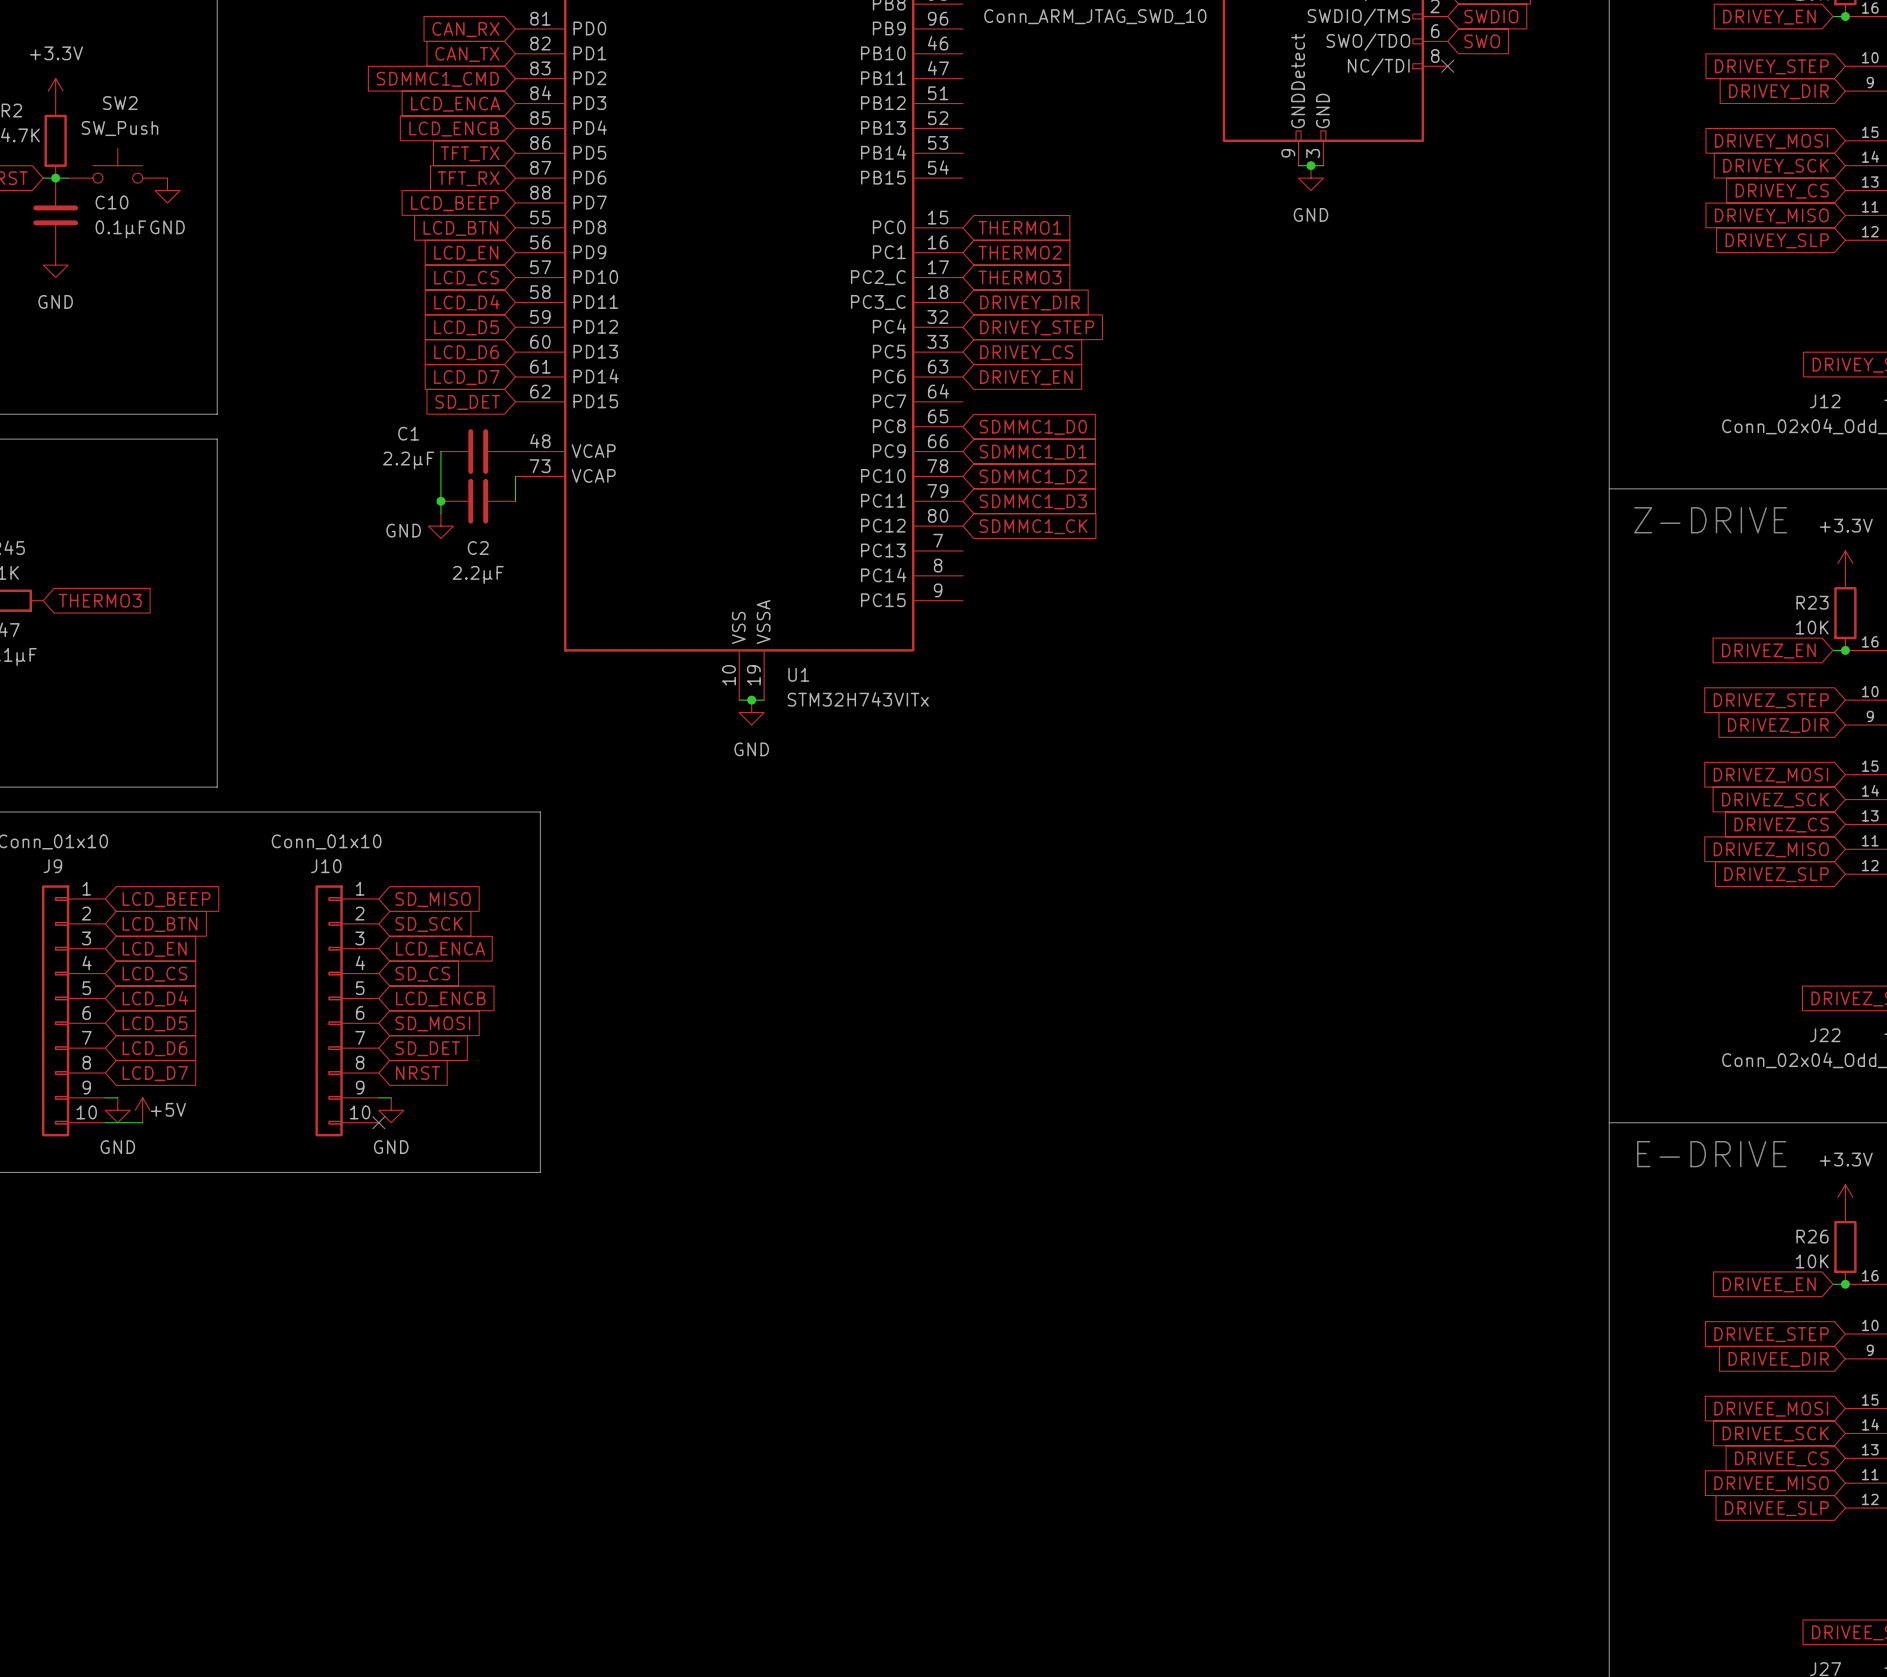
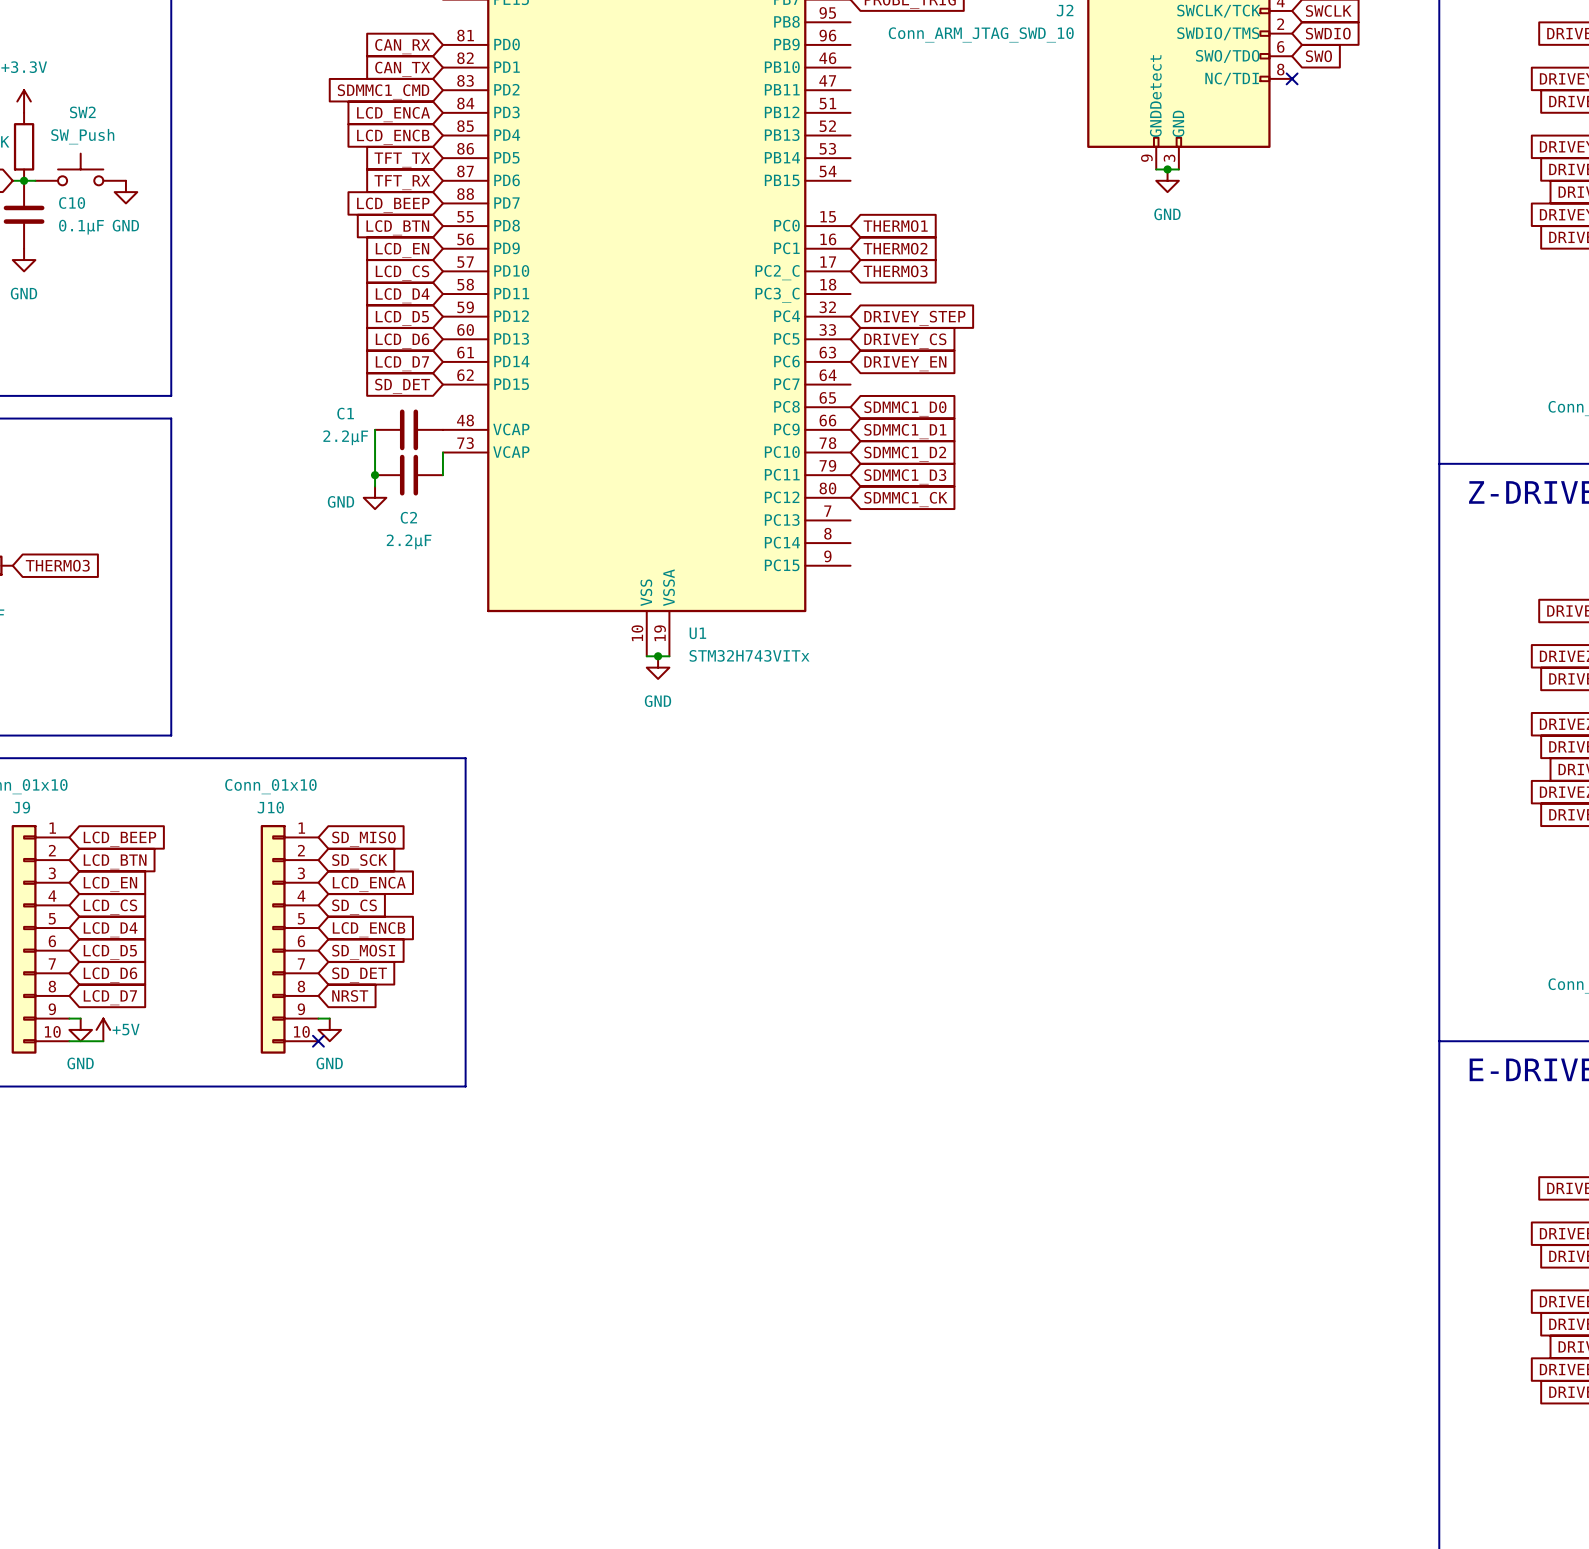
global label: DRIVEY_DIR (1030, 302) -> none

